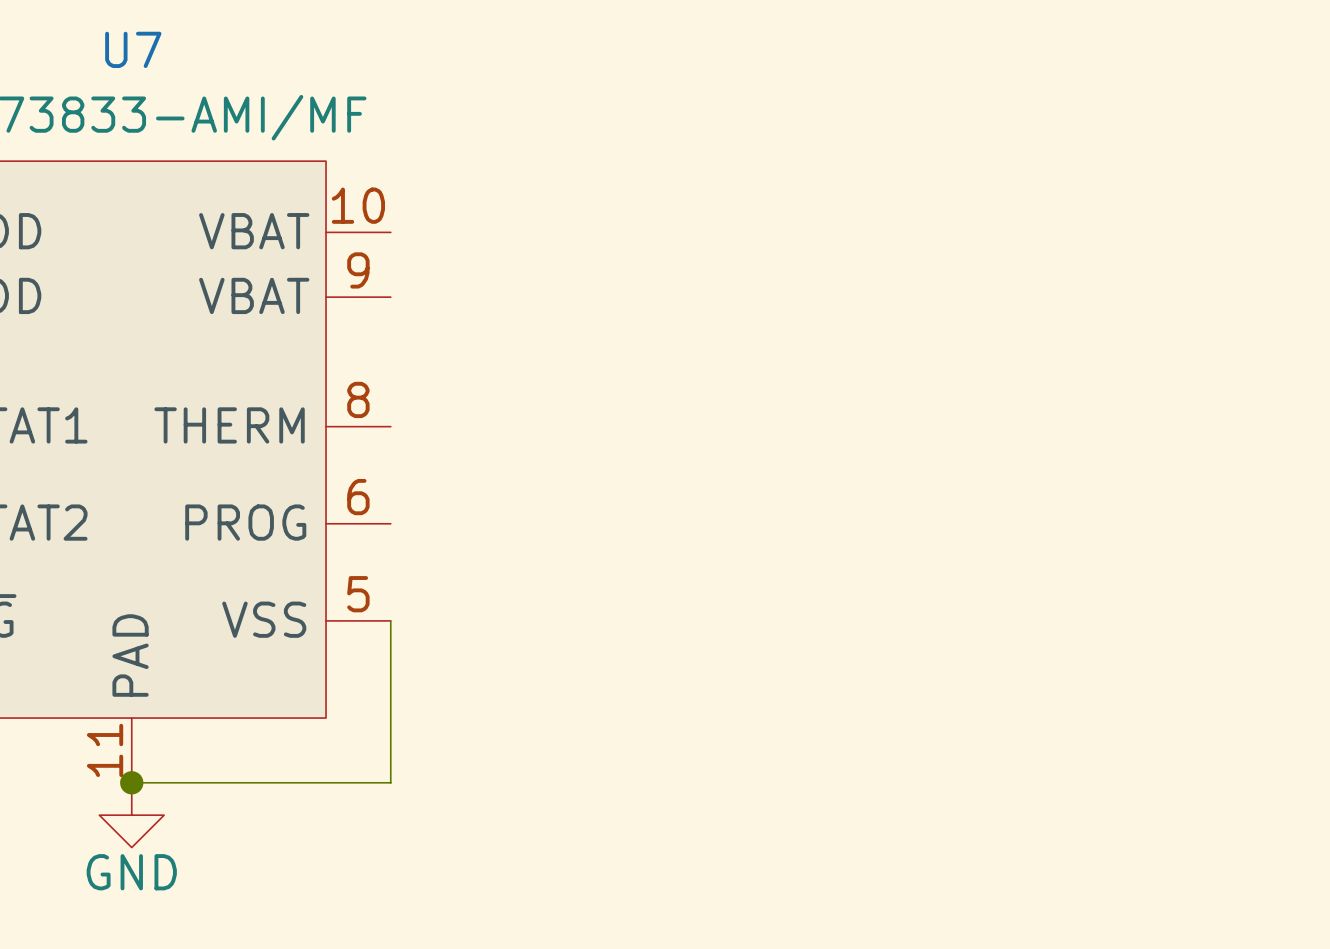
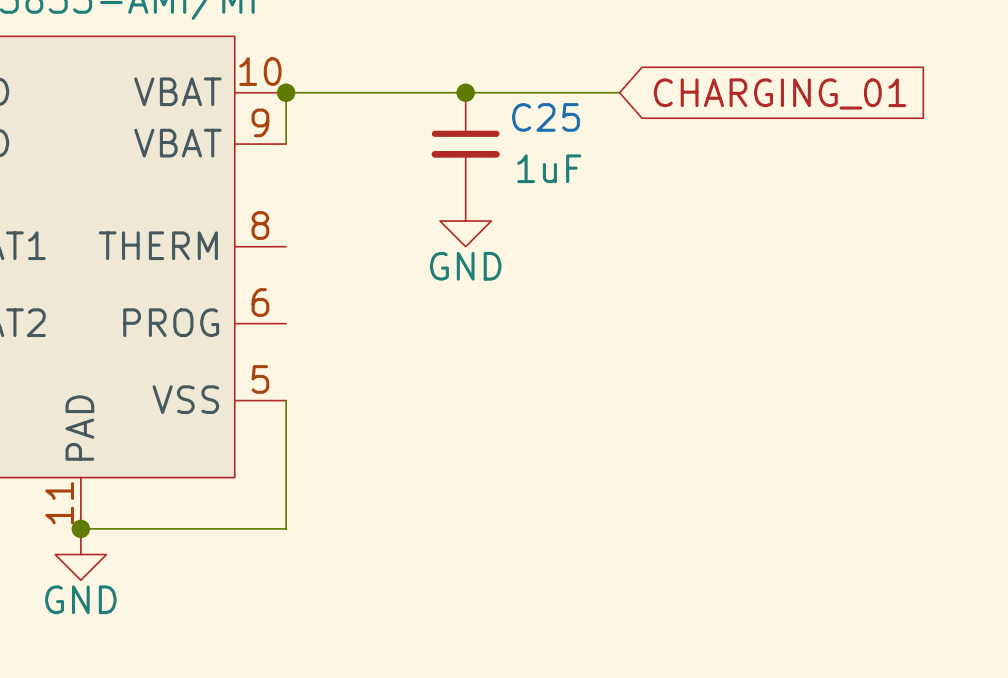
junction: none -> (286, 92)
junction: none -> (465, 92)
wire: none -> (619, 92) (286, 92) (286, 144)
global label: none -> CHARGING_01 (780, 93)
C25: none -> 1uF (465, 144)
power symbol: none -> GND (465, 221)

